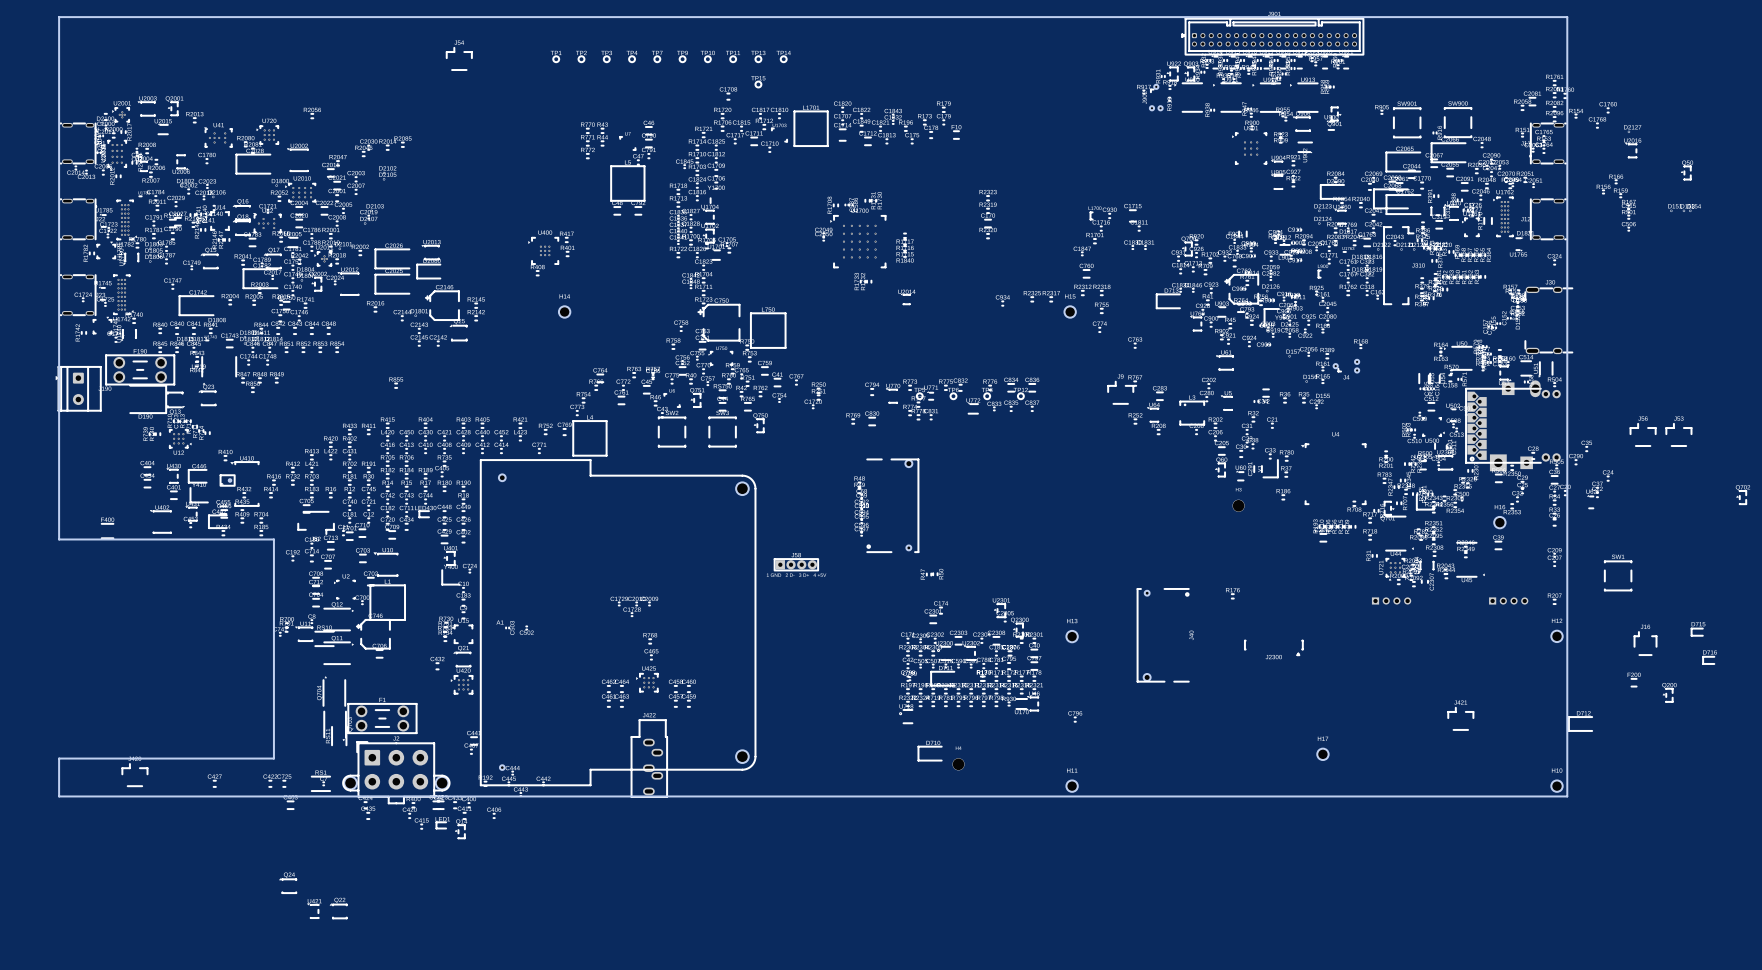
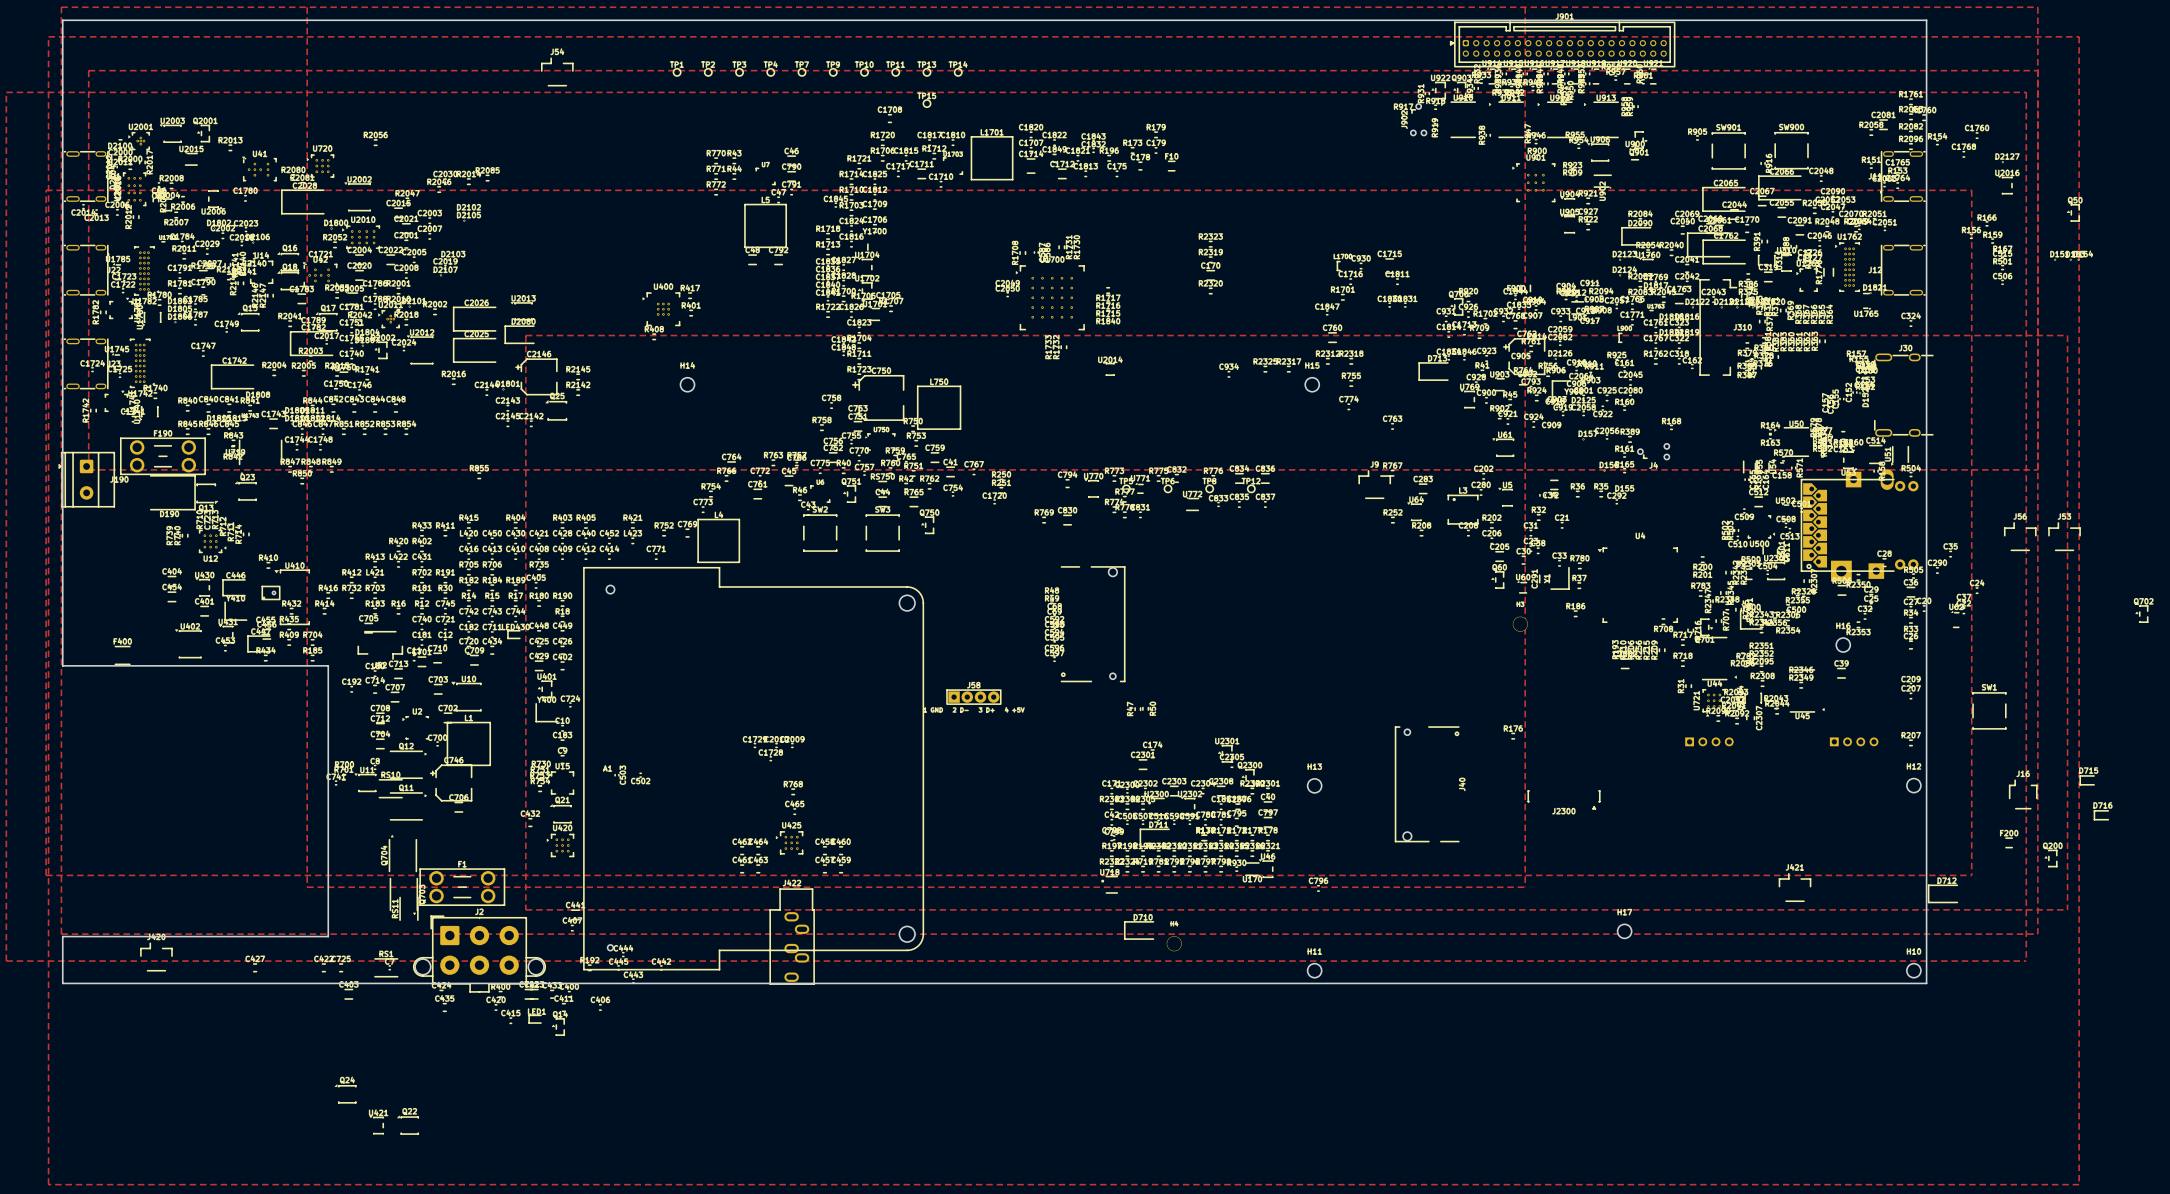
zone outline: none -> (61, 7) (61, 934) (2037, 934) (2037, 7) (61, 7)
zone outline: none -> (307, 7) (307, 887) (1525, 887) (1525, 7)
zone outline: none -> (48, 36) (48, 1184) (2079, 1184) (2079, 36) (48, 36)
zone outline: none -> (2037, 70) (88, 70) (88, 469) (2037, 469)
zone outline: none -> (6, 92) (6, 961) (2026, 961) (2026, 92) (6, 92)
zone outline: none -> (46, 190) (46, 875) (1971, 875) (1971, 190) (46, 190)
zone outline: none -> (525, 335) (525, 909) (2067, 909) (2067, 335) (525, 335)

